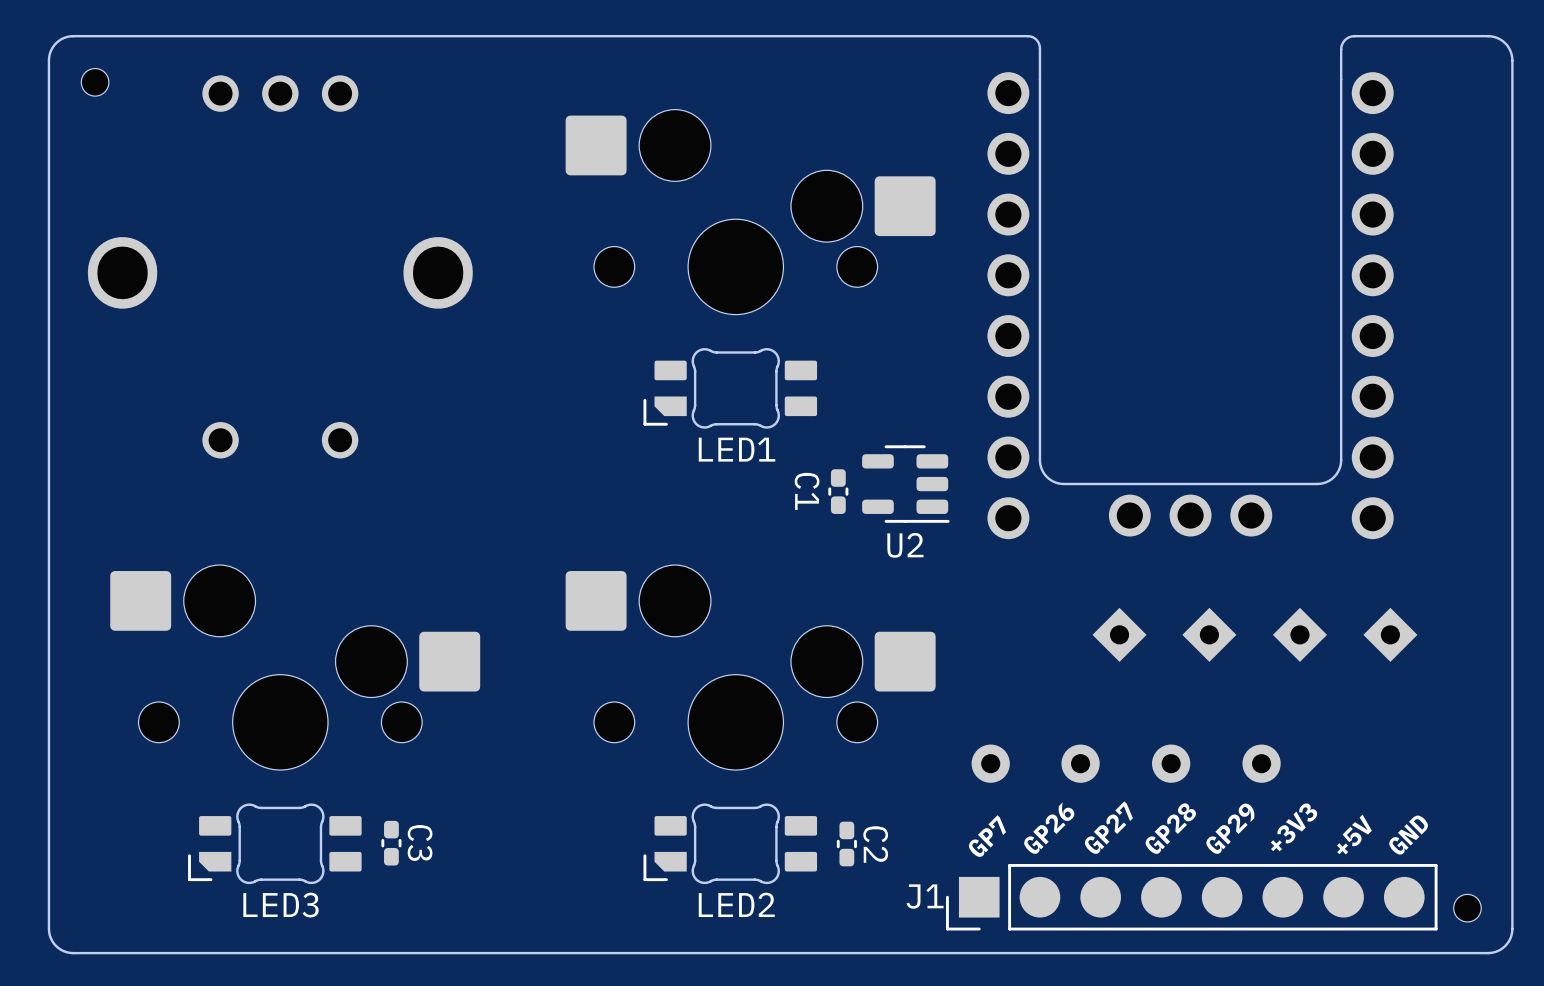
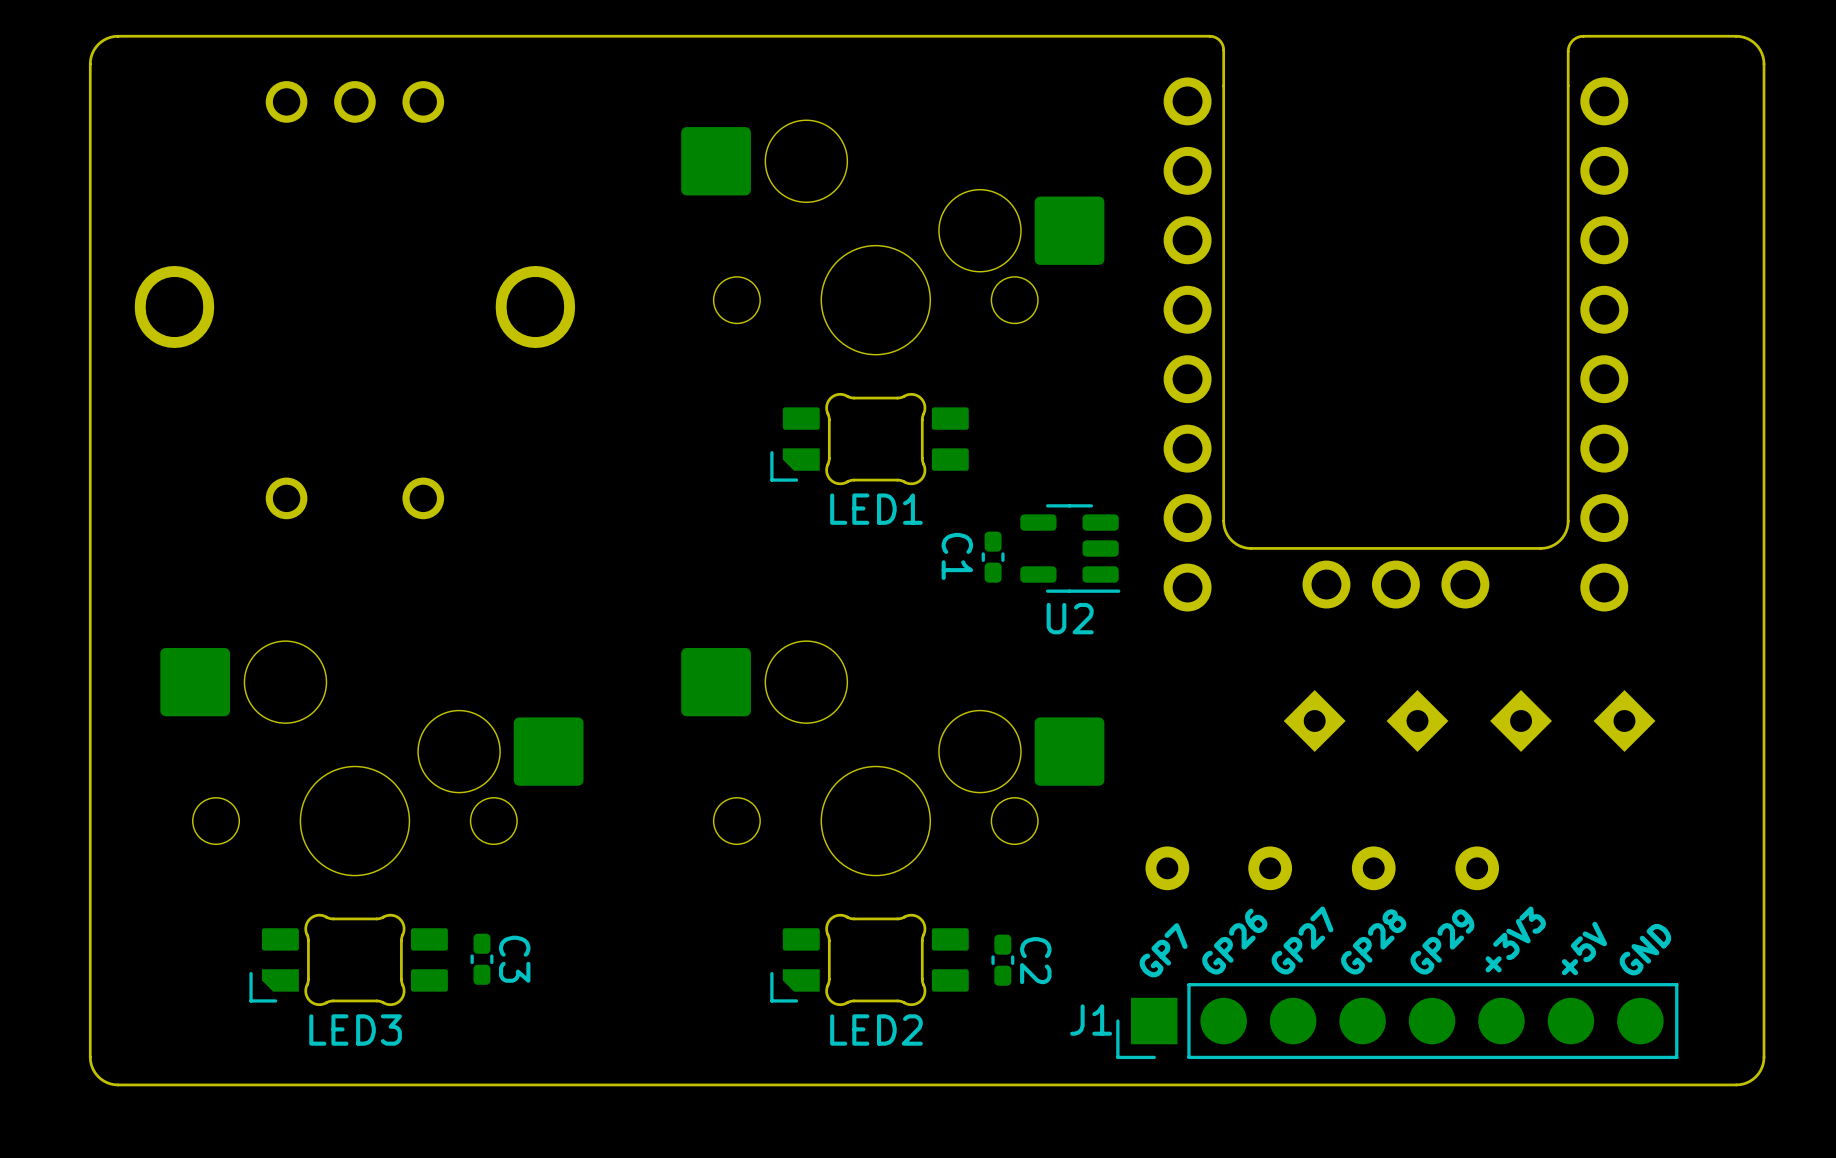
part: (95, 82) -> none
part: (1467, 908) -> none

